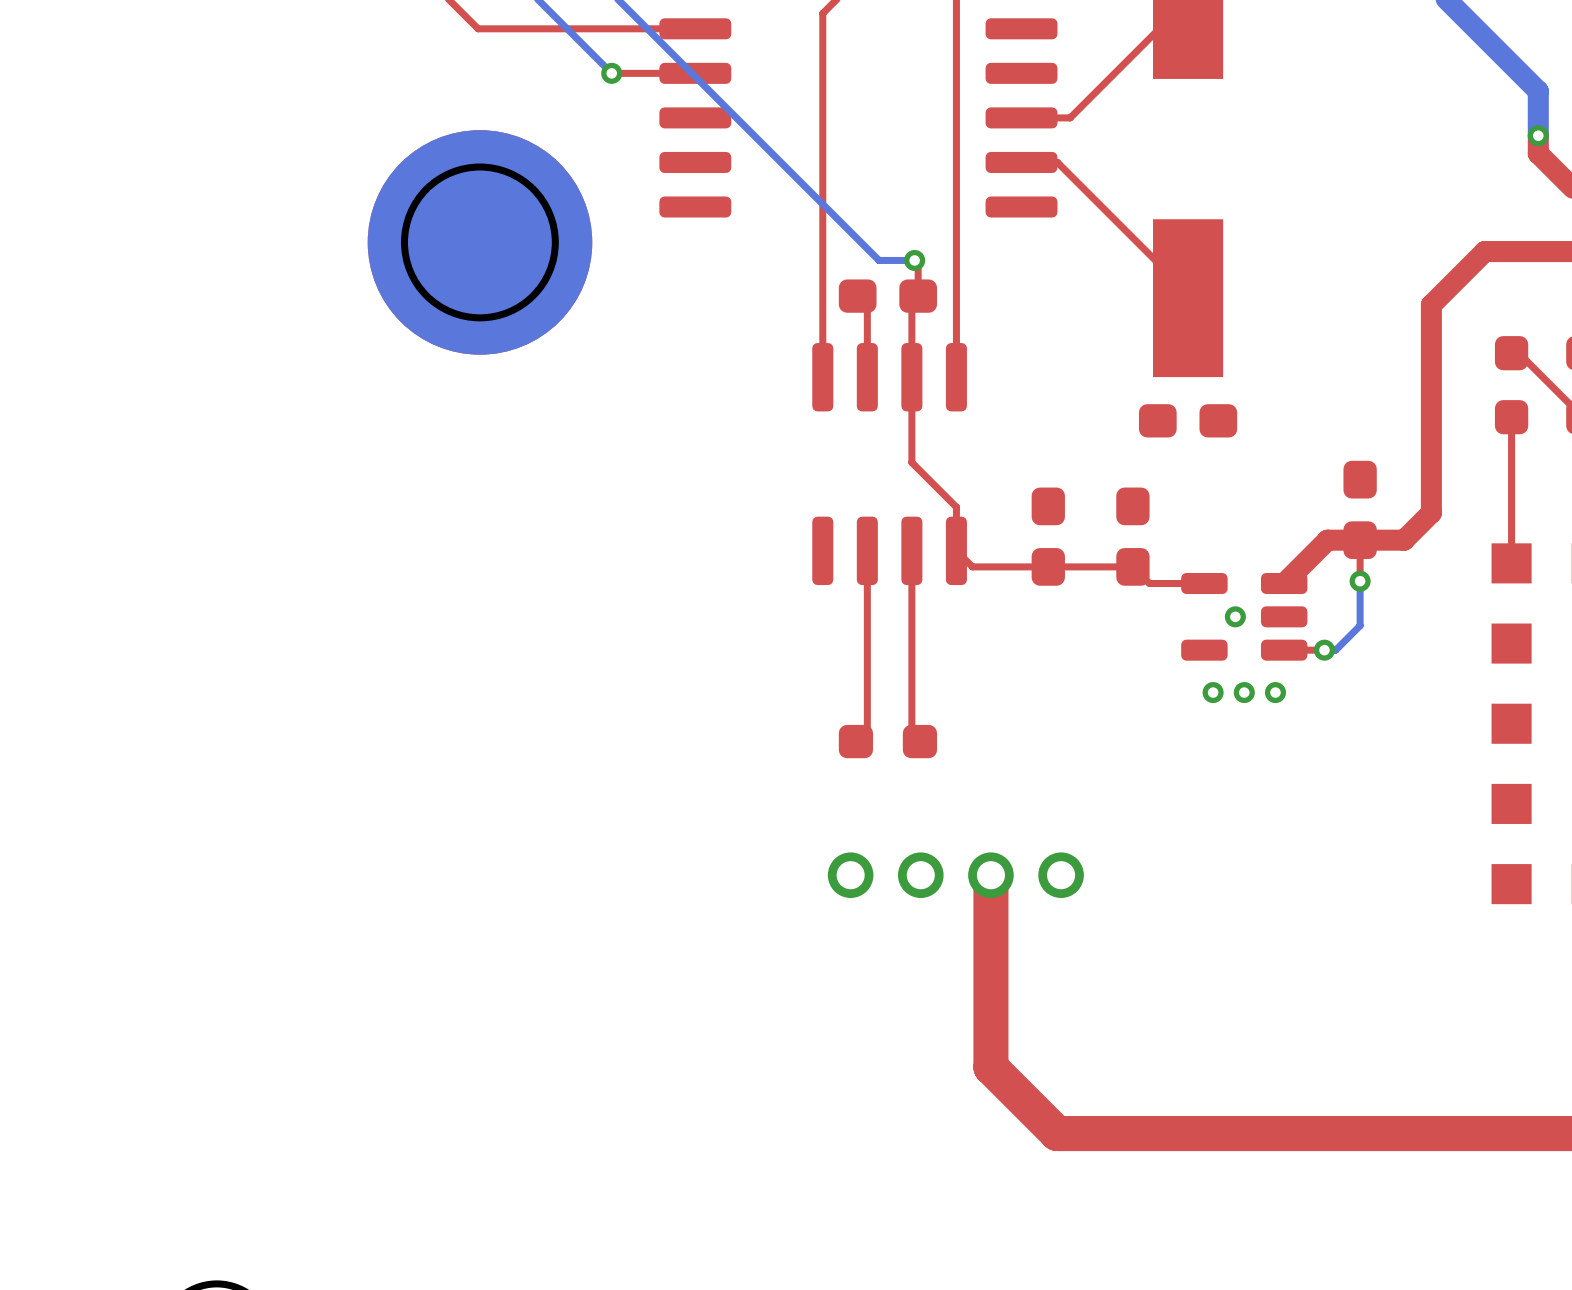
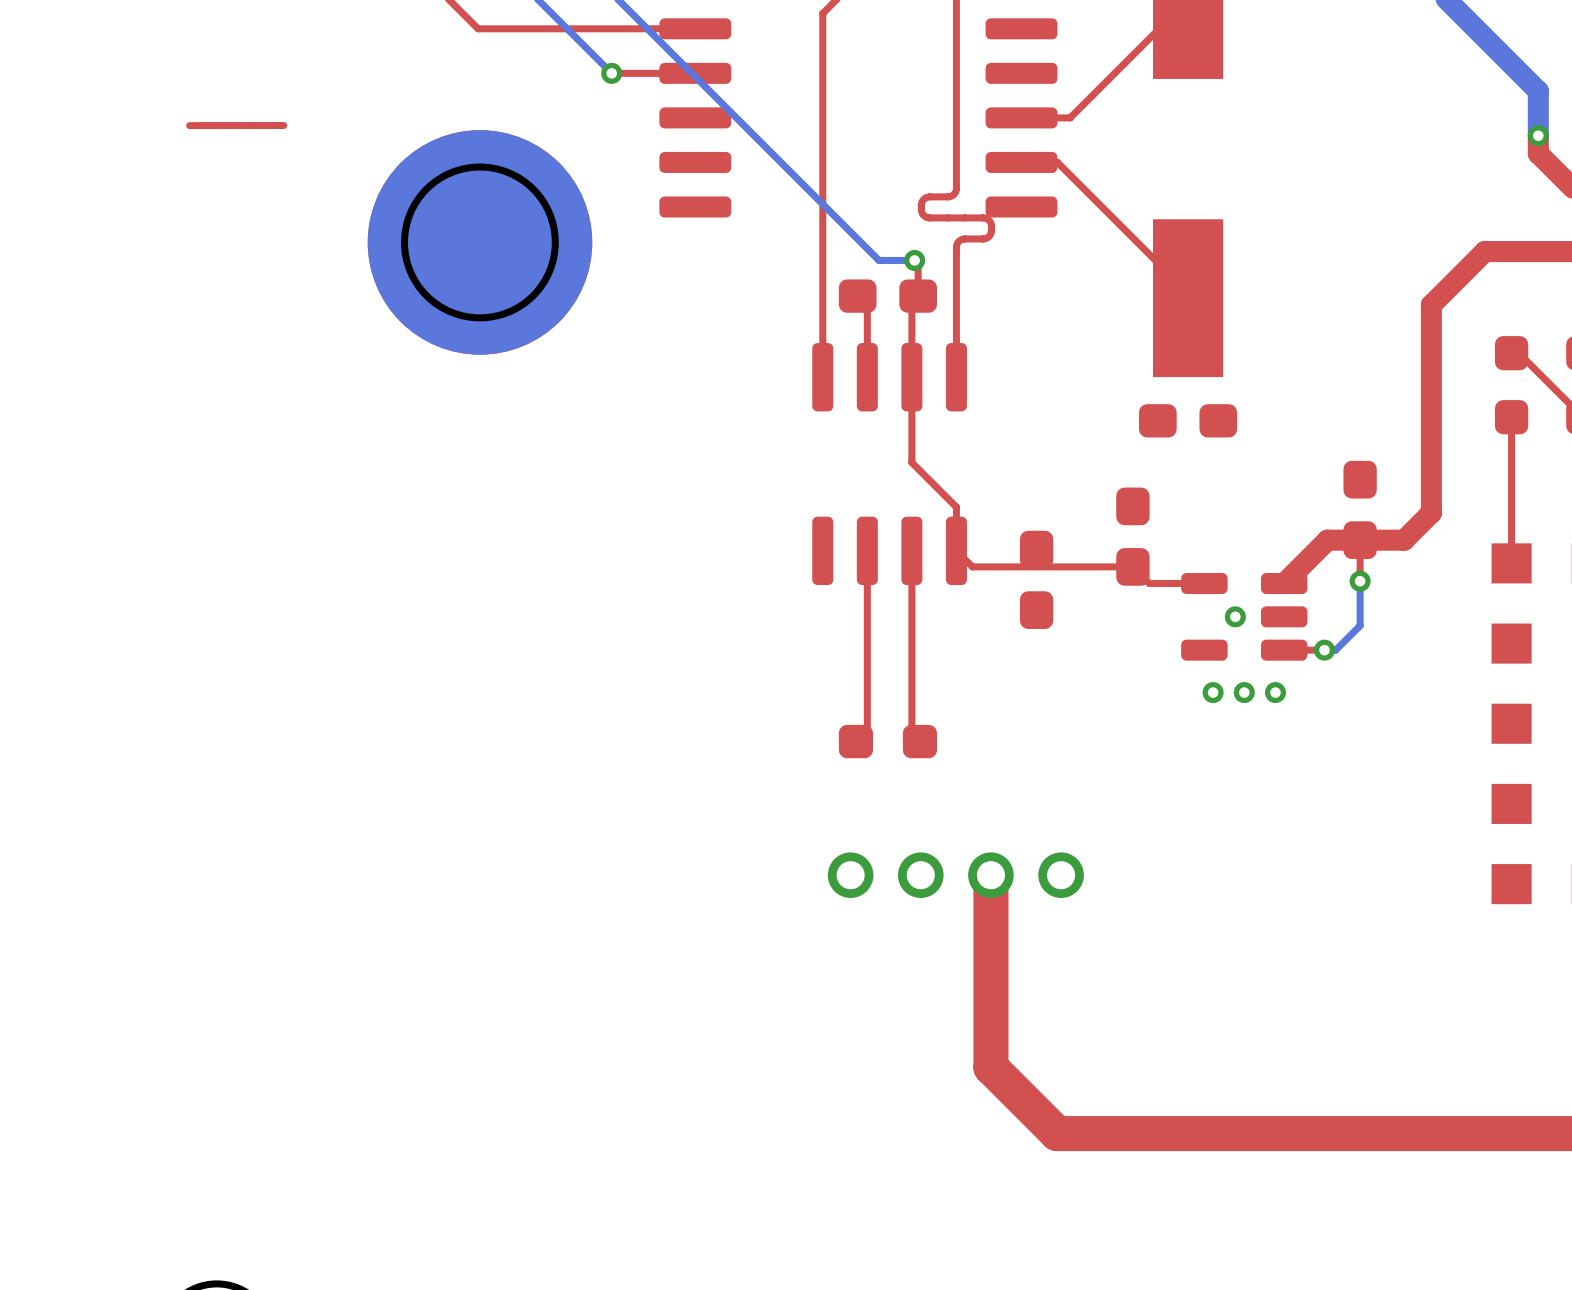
top track: none -> (283, 125) (189, 125)
top track: (956, 188) (956, 247) -> (956, 188) (955, 192) (950, 196) (926, 197) (921, 205) (922, 213) (927, 217) (983, 217) (989, 221) (991, 231) (988, 237) (962, 239) (958, 242) (956, 247)
part position: (1048, 536) -> (1036, 579)

